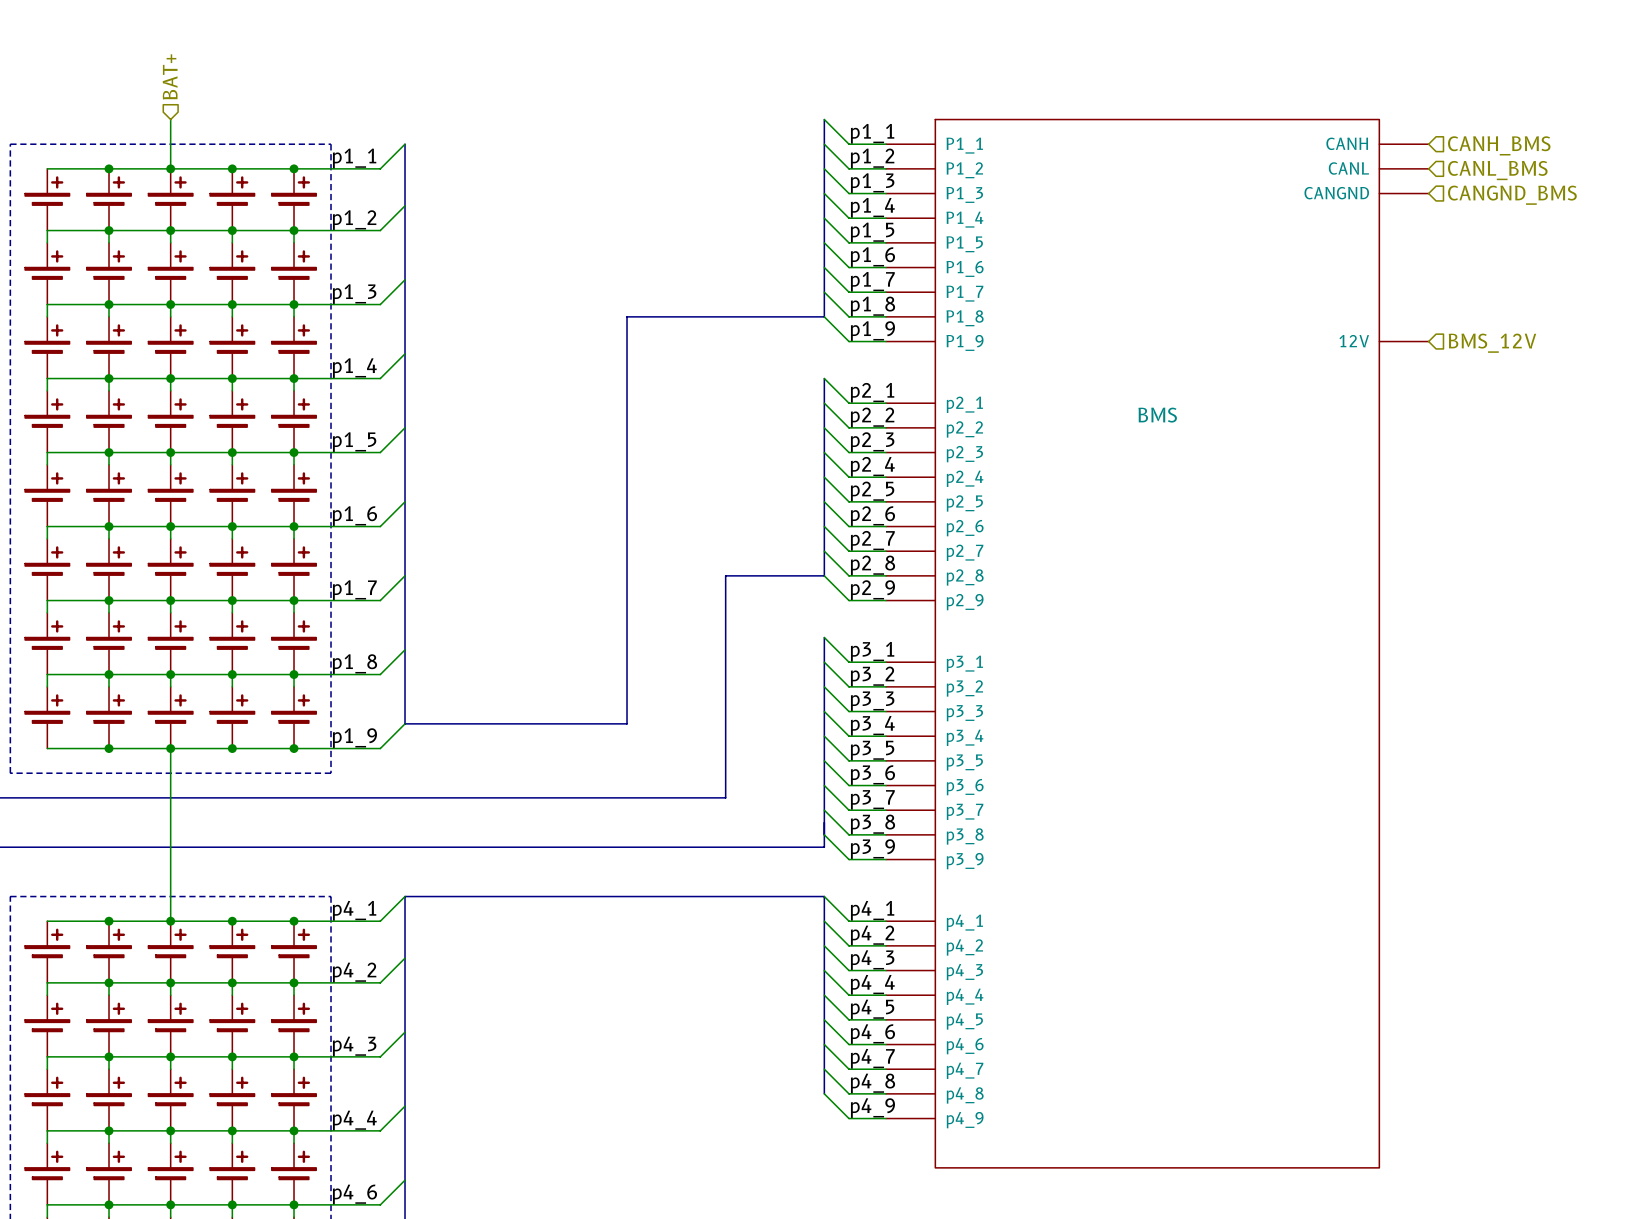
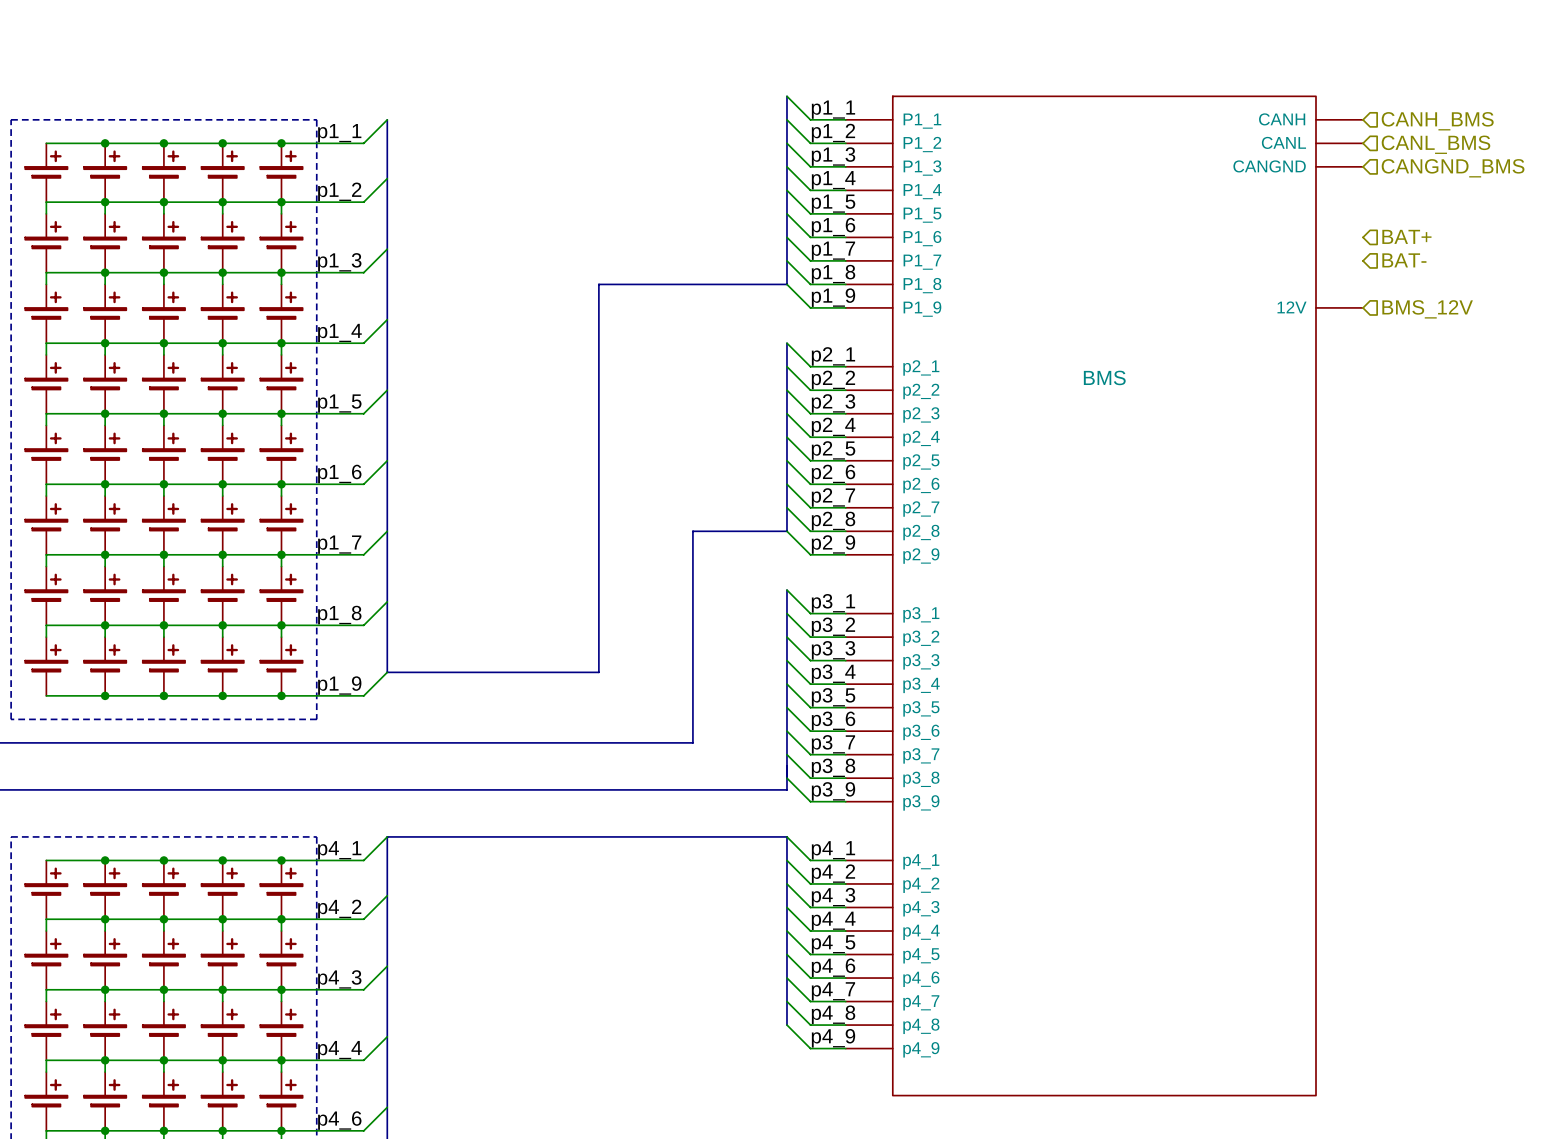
hierarchical label: BAT+ (170, 76) -> none
wire: (170, 119) (170, 168) -> none
hierarchical label: none -> BAT+ (1406, 236)
hierarchical label: none -> BAT- (1404, 260)
wire: (170, 748) (170, 921) -> none

